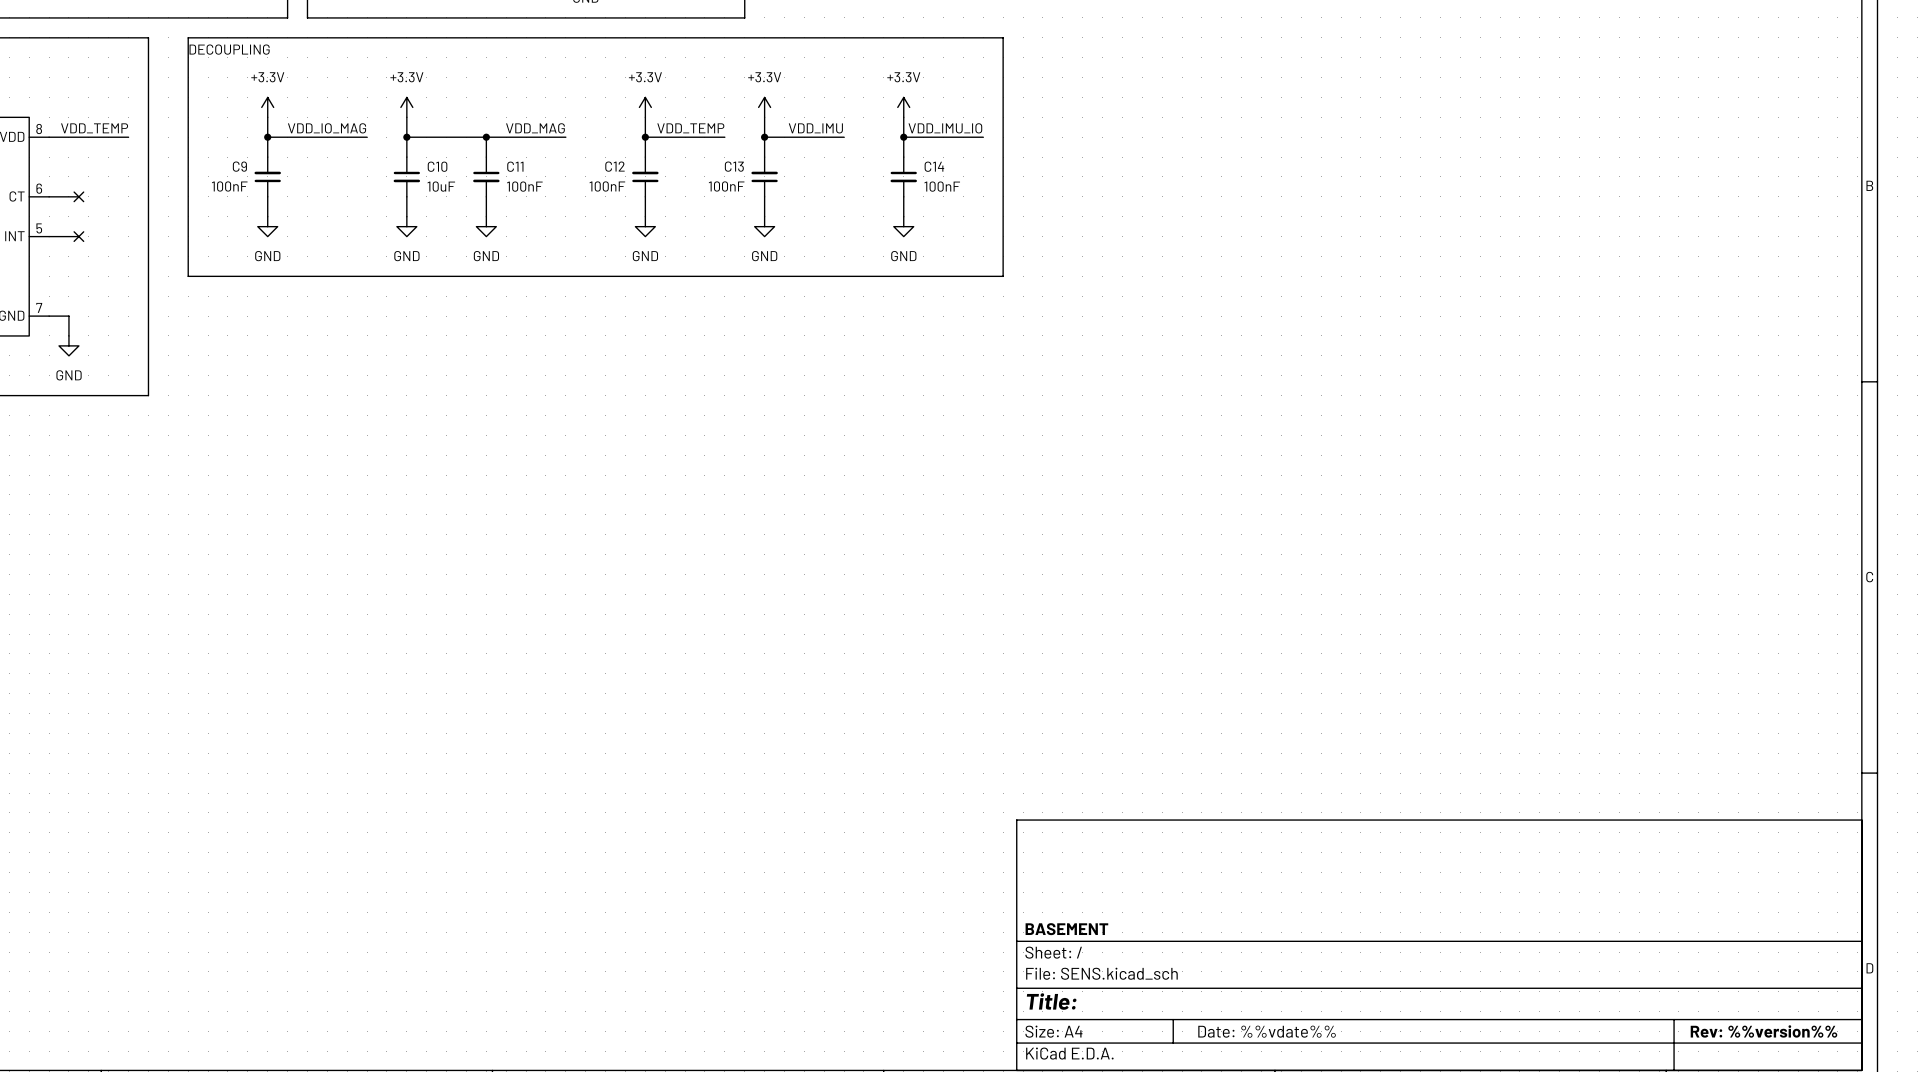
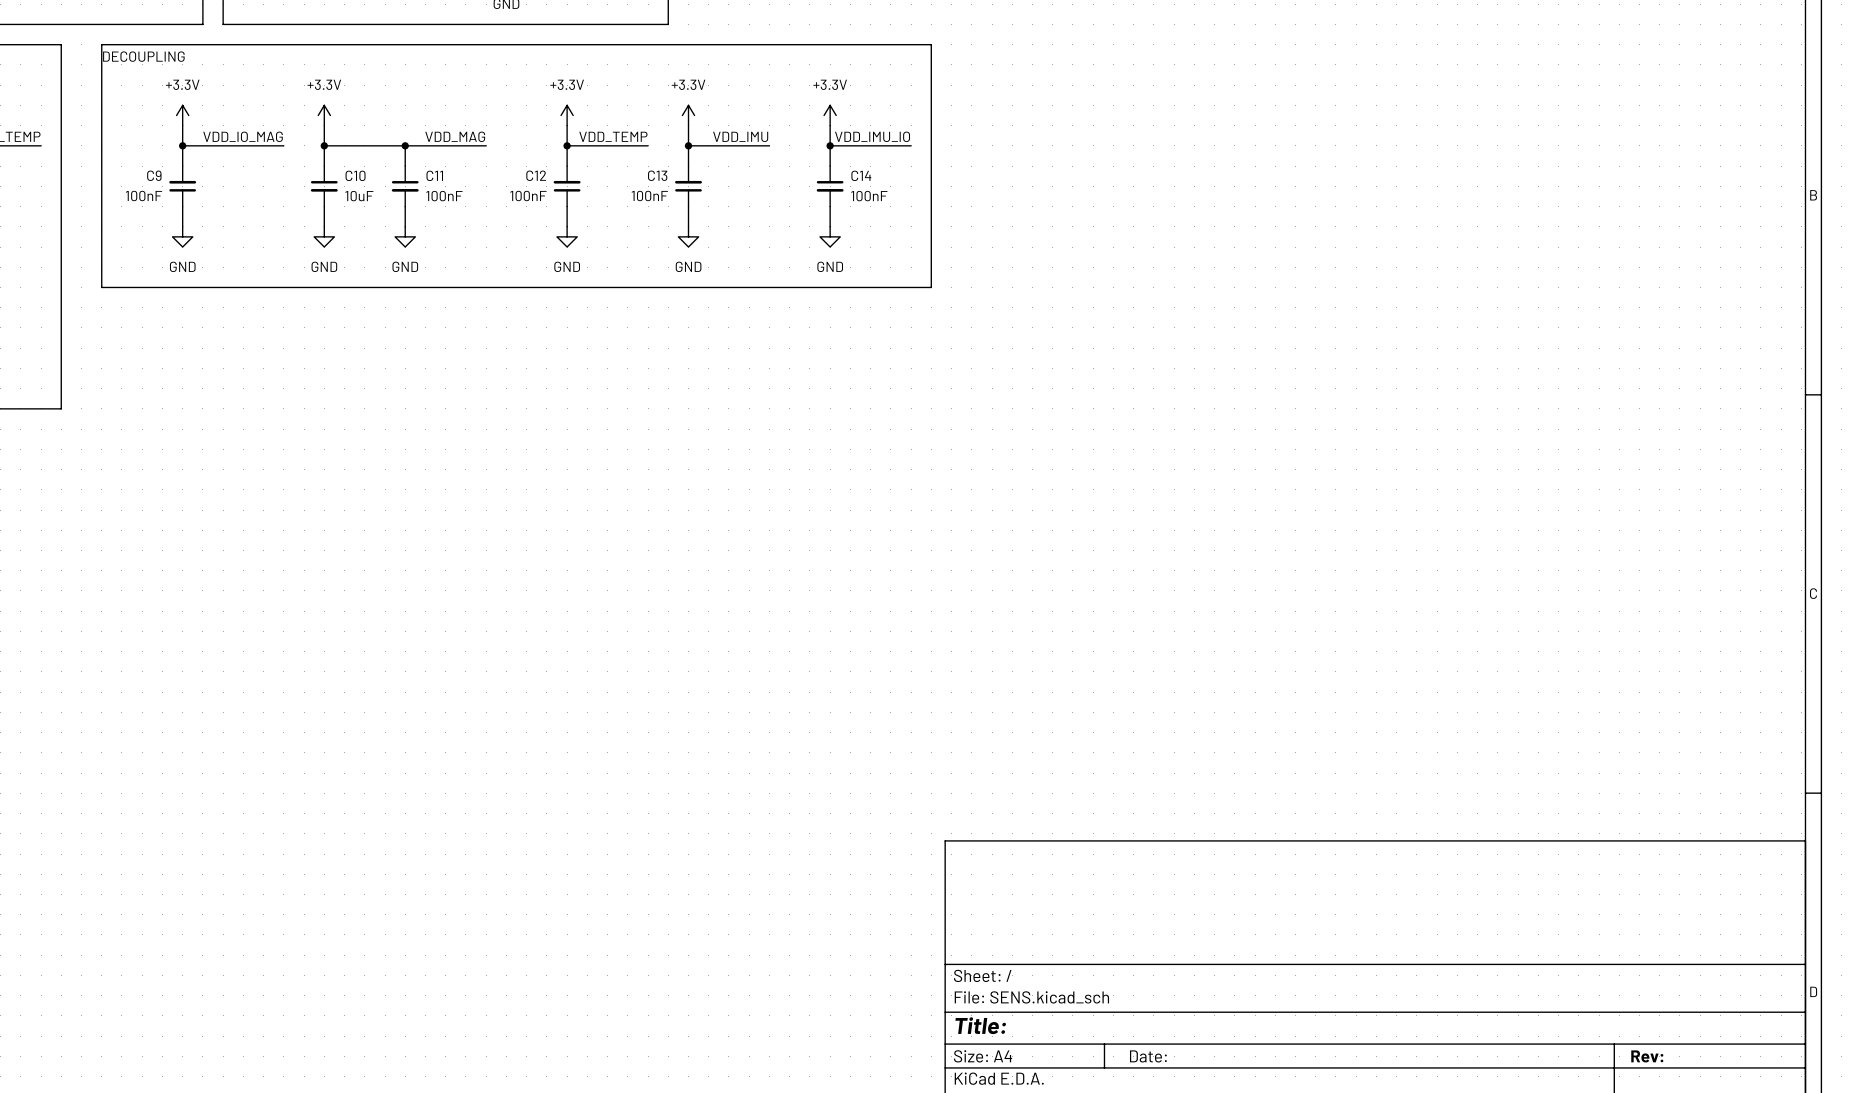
title block: BASEMENT (1066, 929) -> none
title block: Date: %%vdate%% (1267, 1031) -> Date: (1148, 1056)
title block: Rev: %%version%% (1763, 1031) -> Rev: (1647, 1056)

